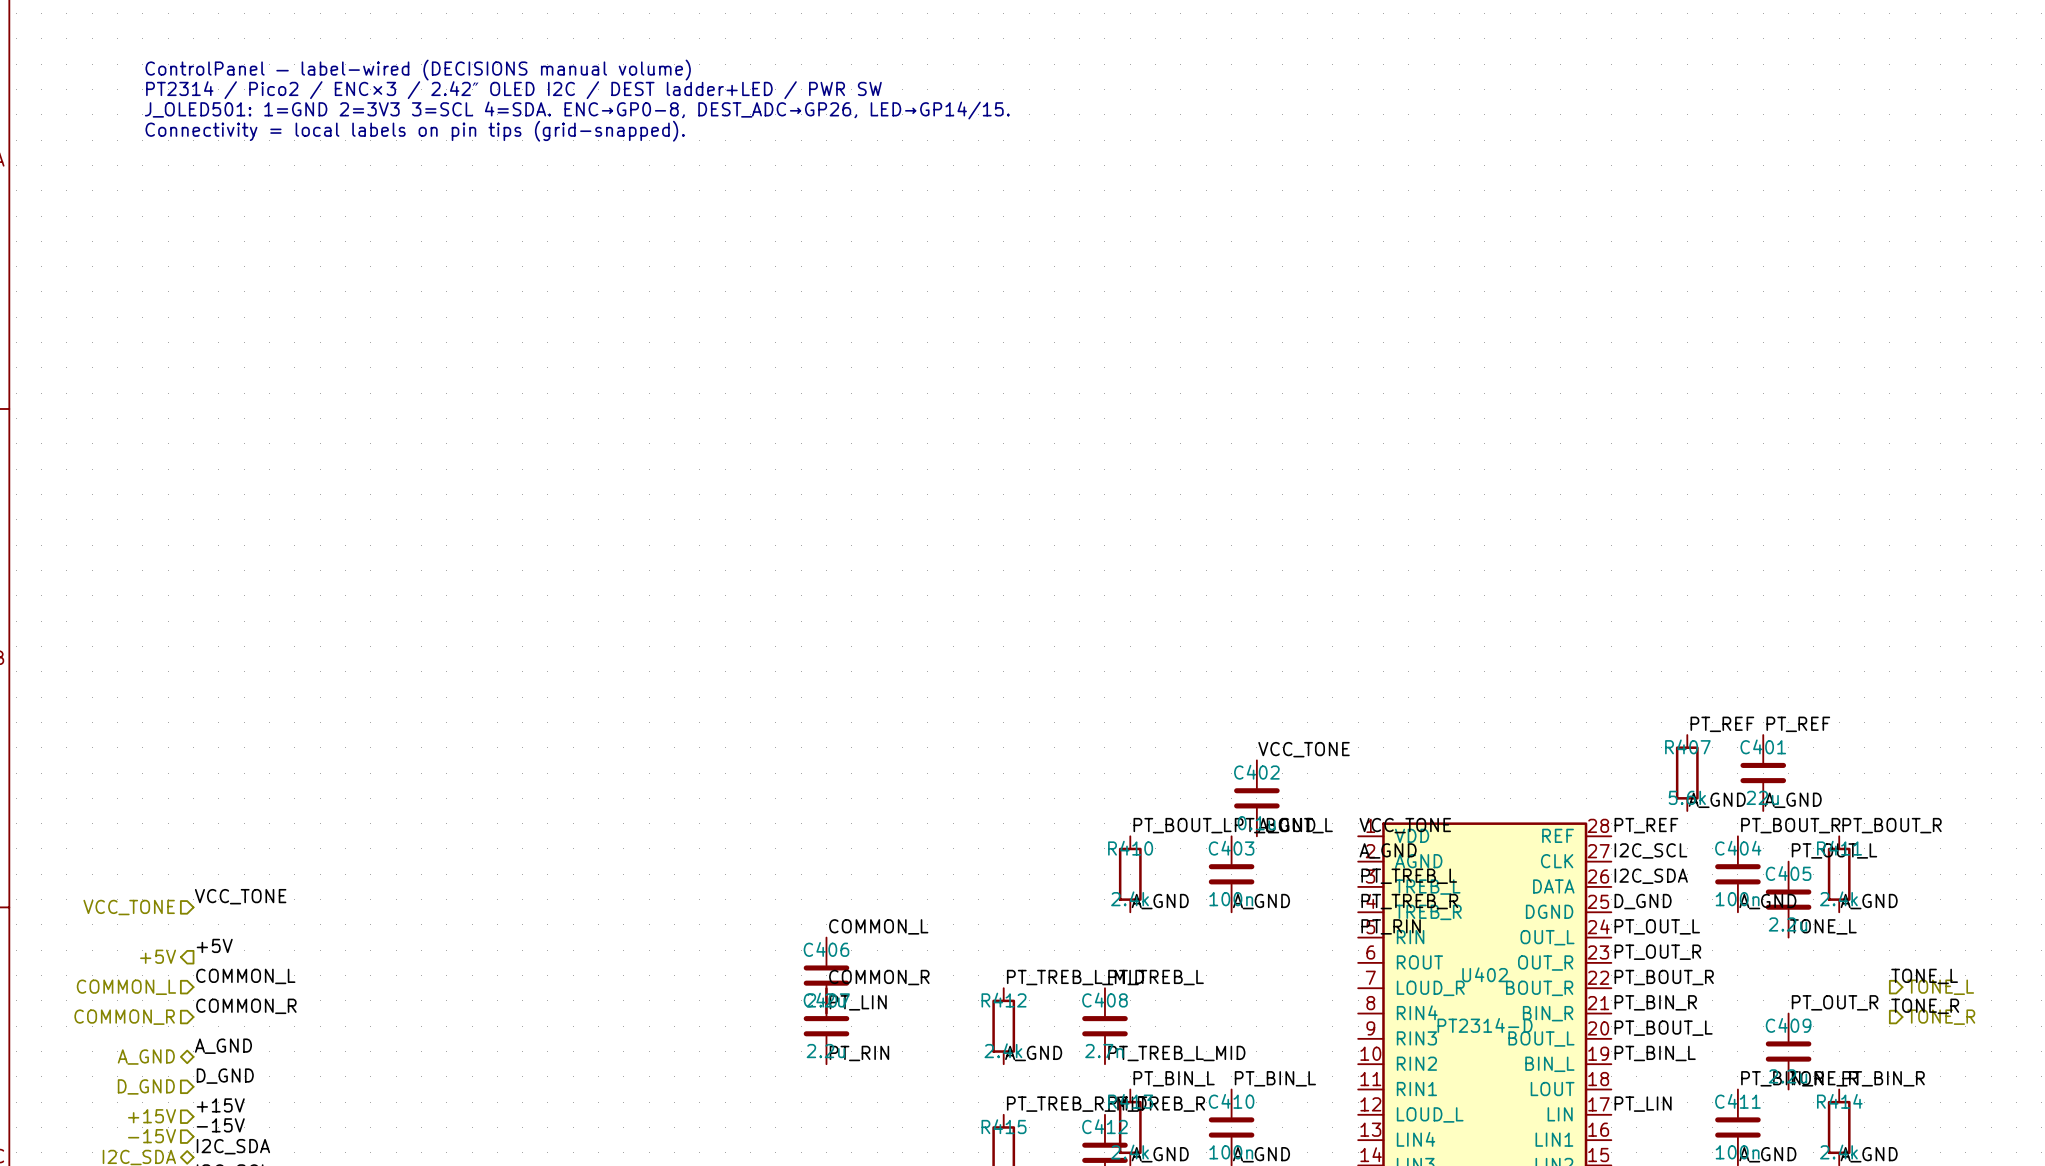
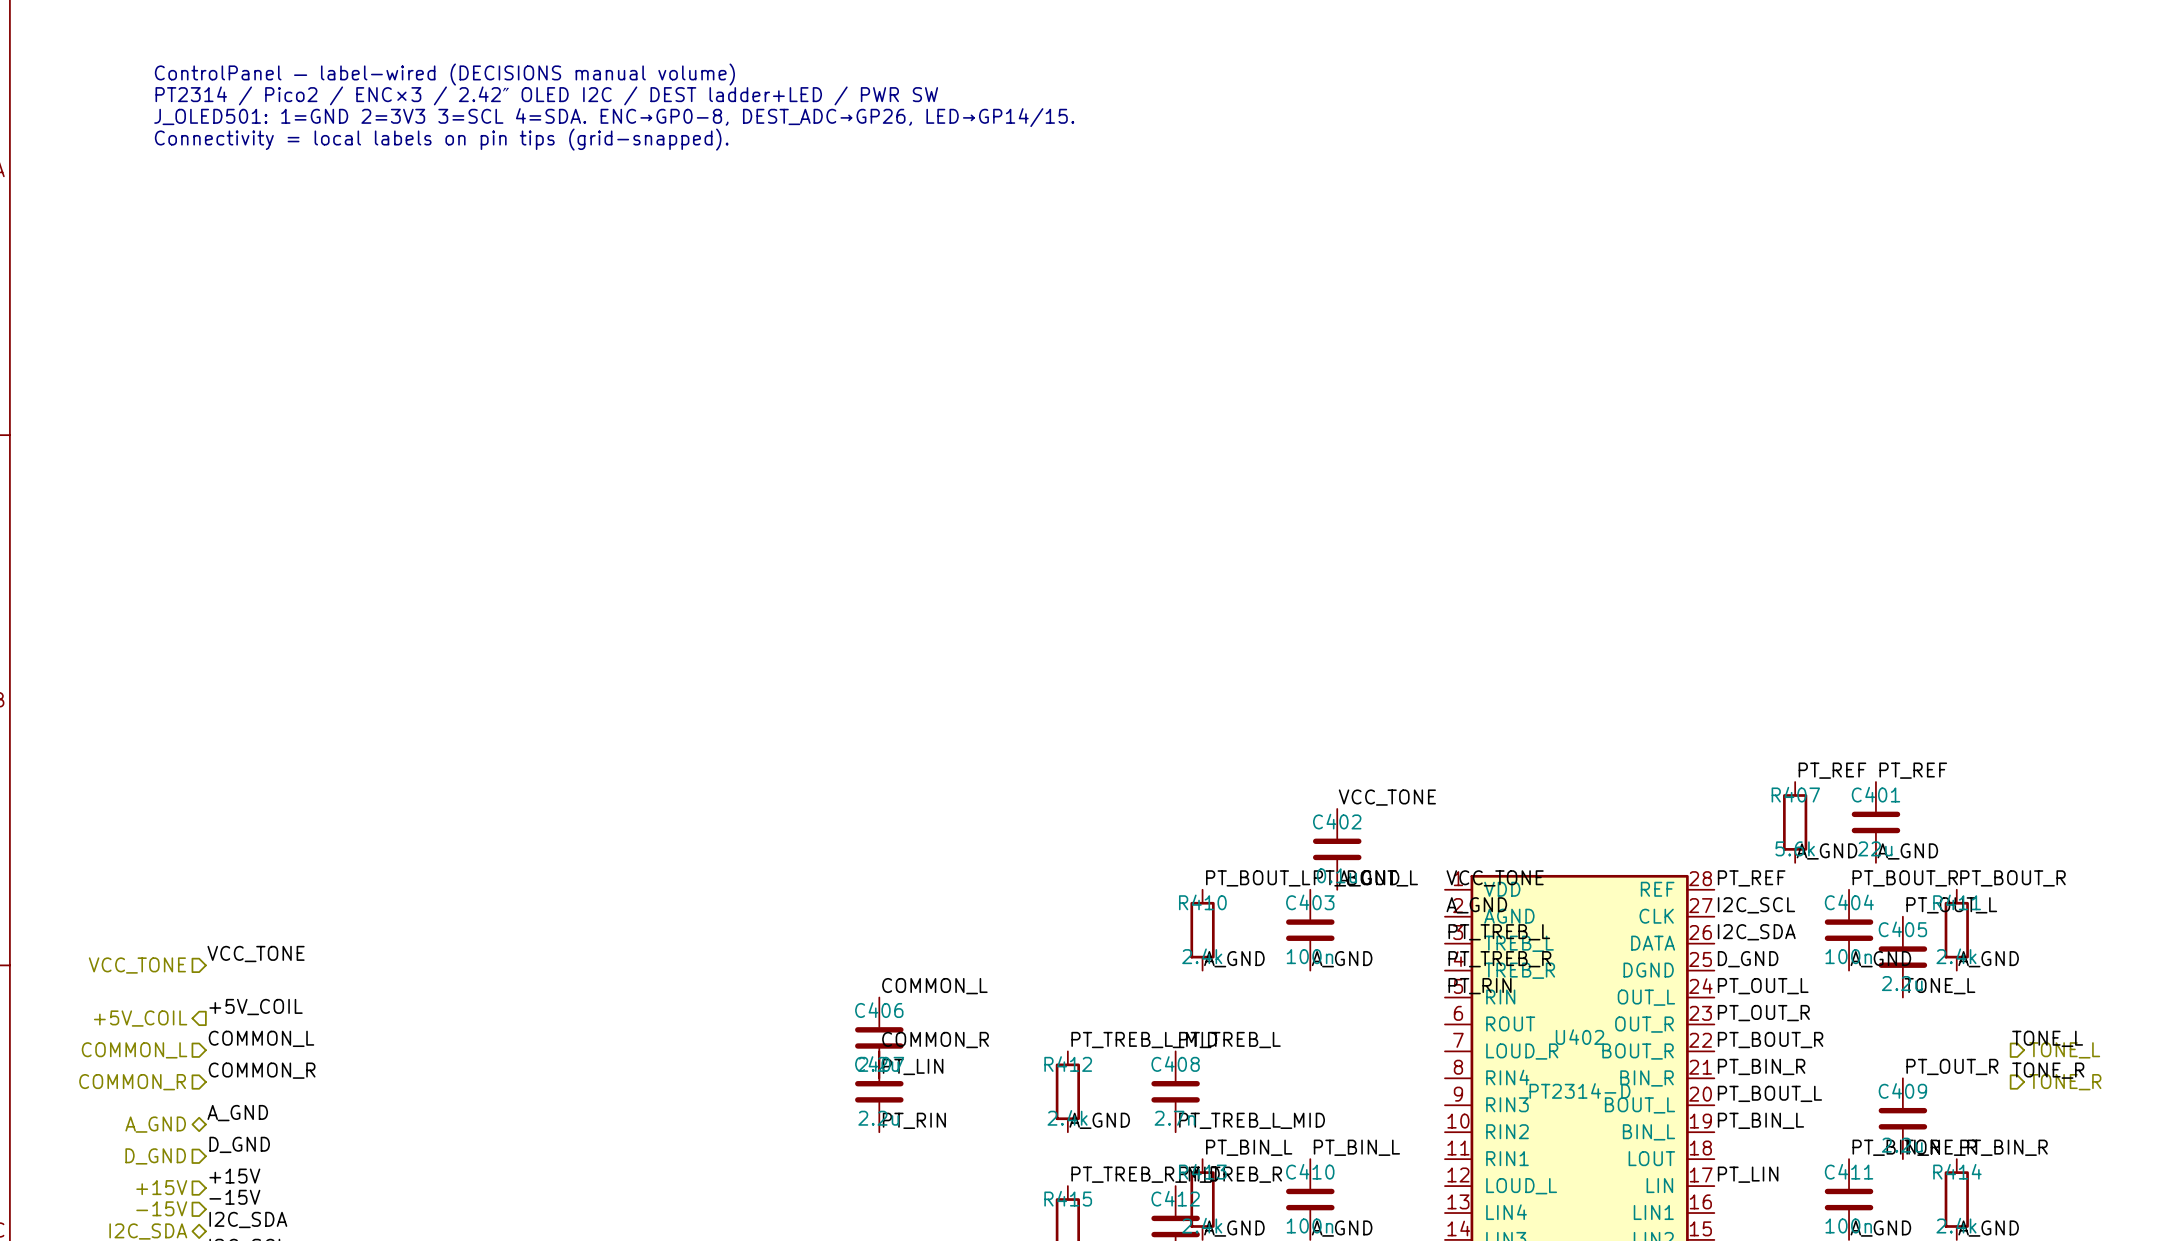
label: +5V (214, 945) -> +5V_COIL (256, 1007)
hierarchical label: +5V (158, 956) -> +5V_COIL (140, 1018)

